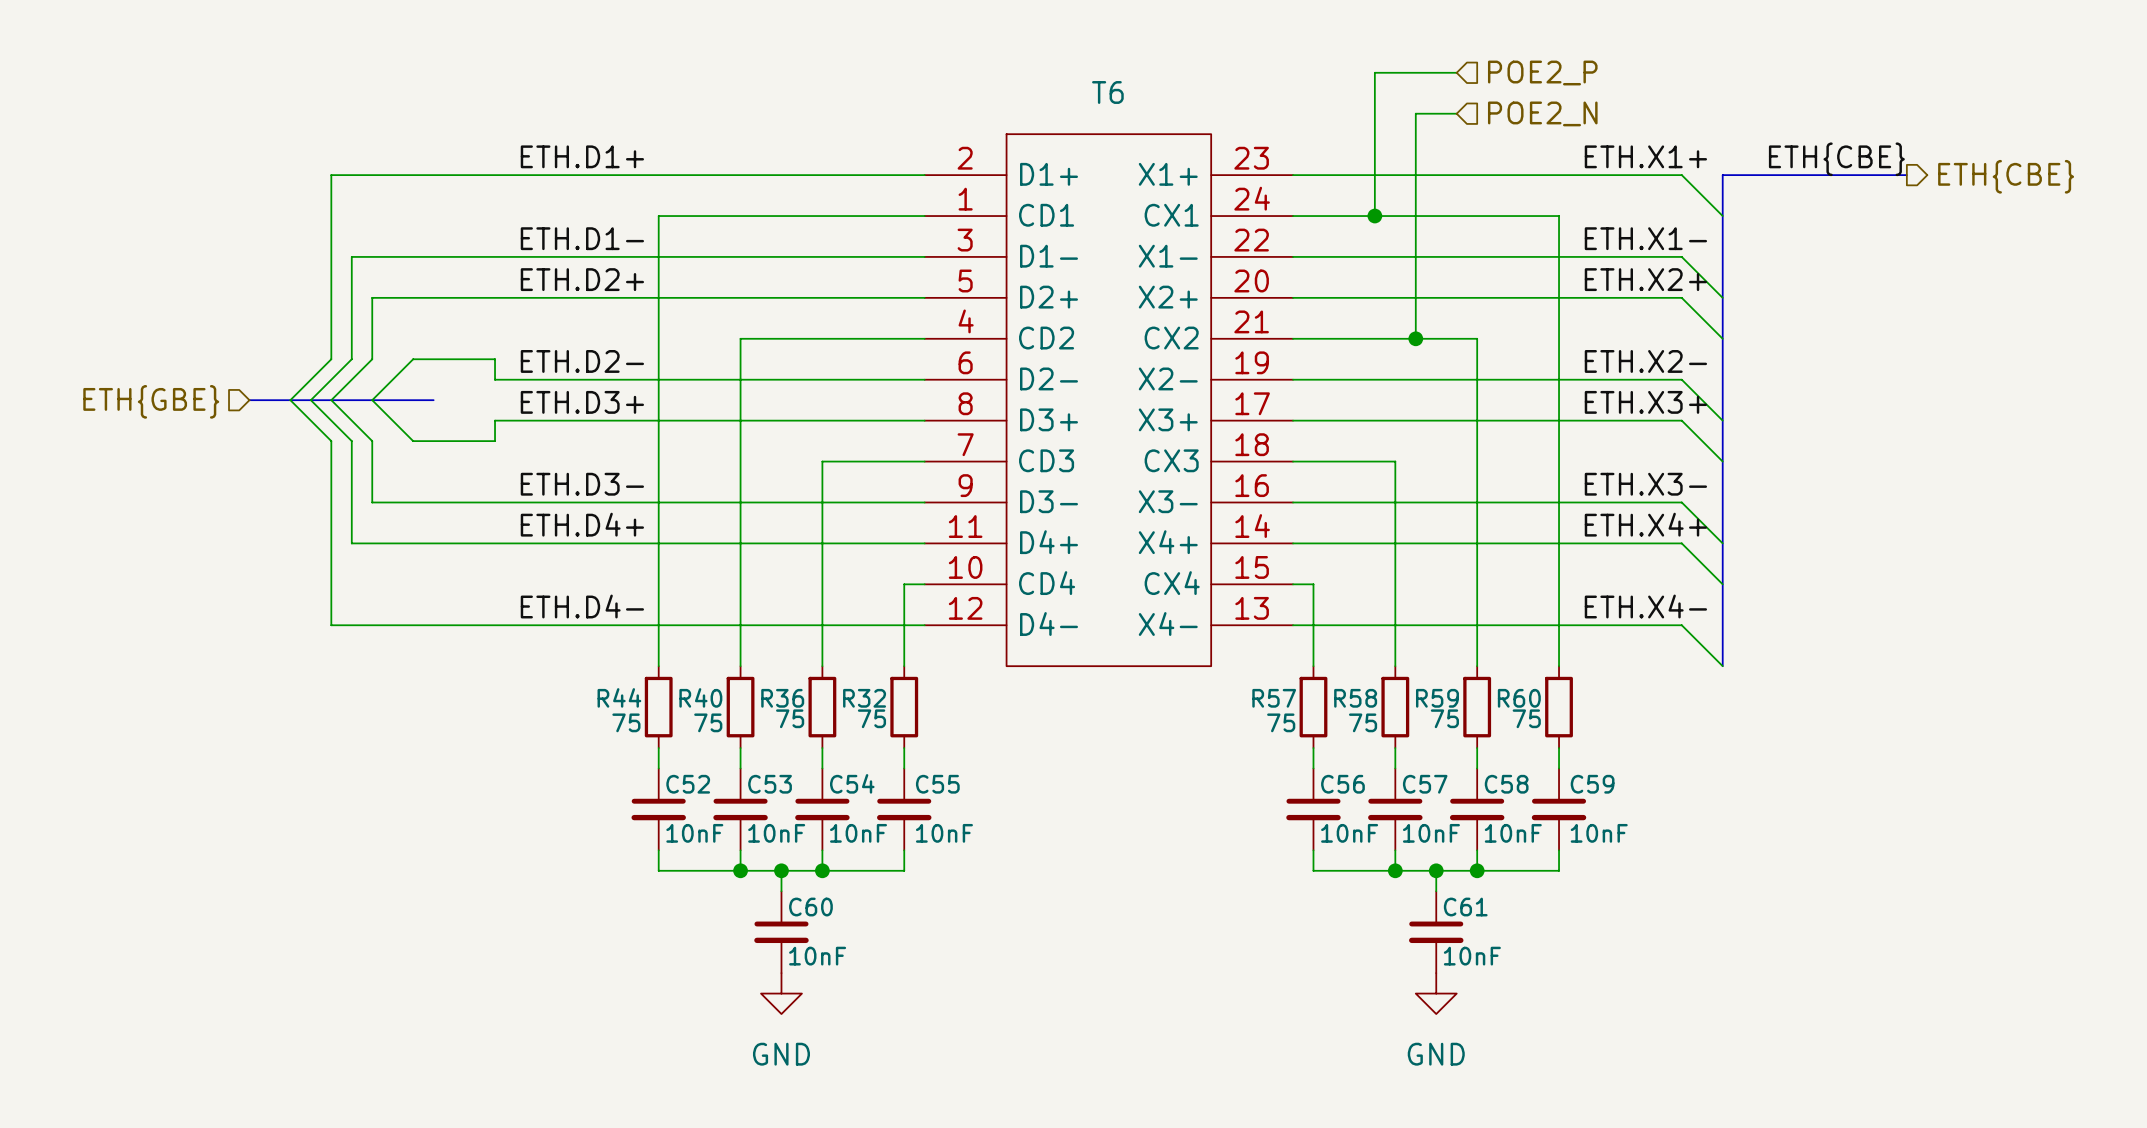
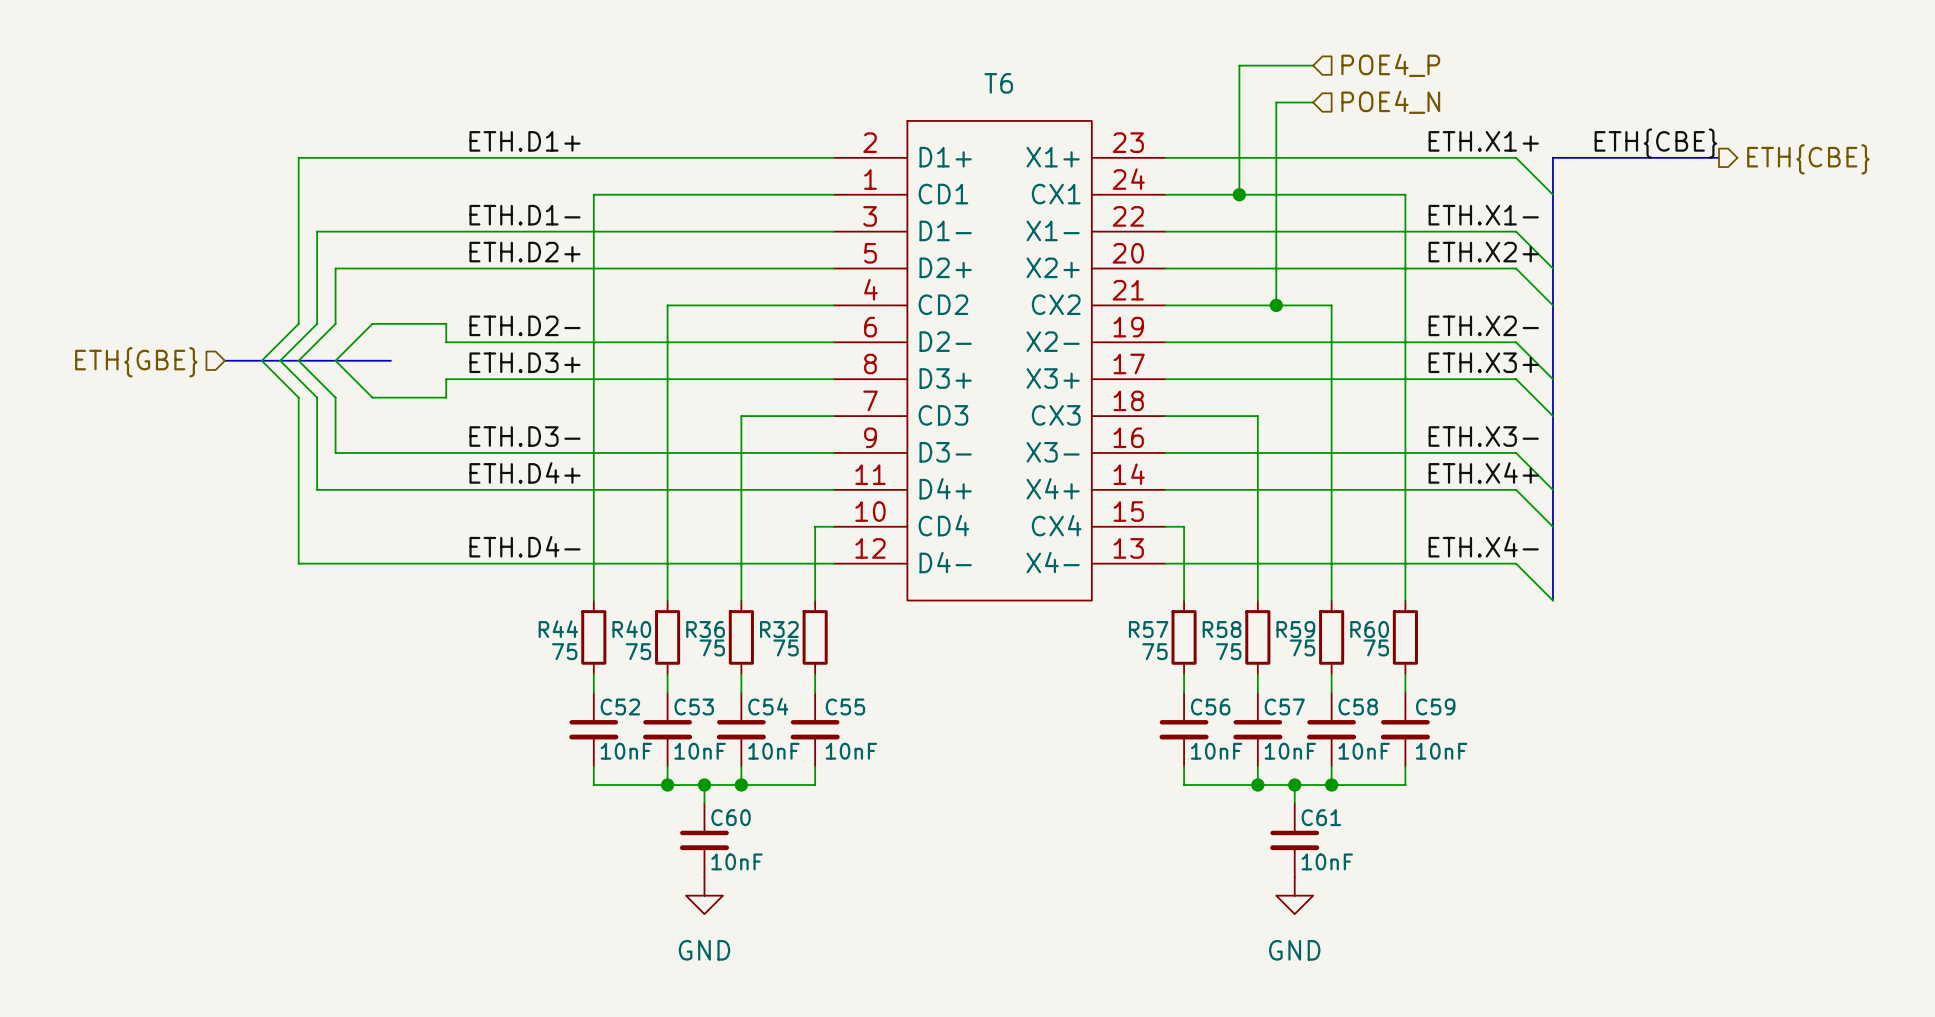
hierarchical label: POE2_P (1542, 73) -> POE4_P (1390, 65)
hierarchical label: POE2_N (1542, 113) -> POE4_N (1390, 102)

